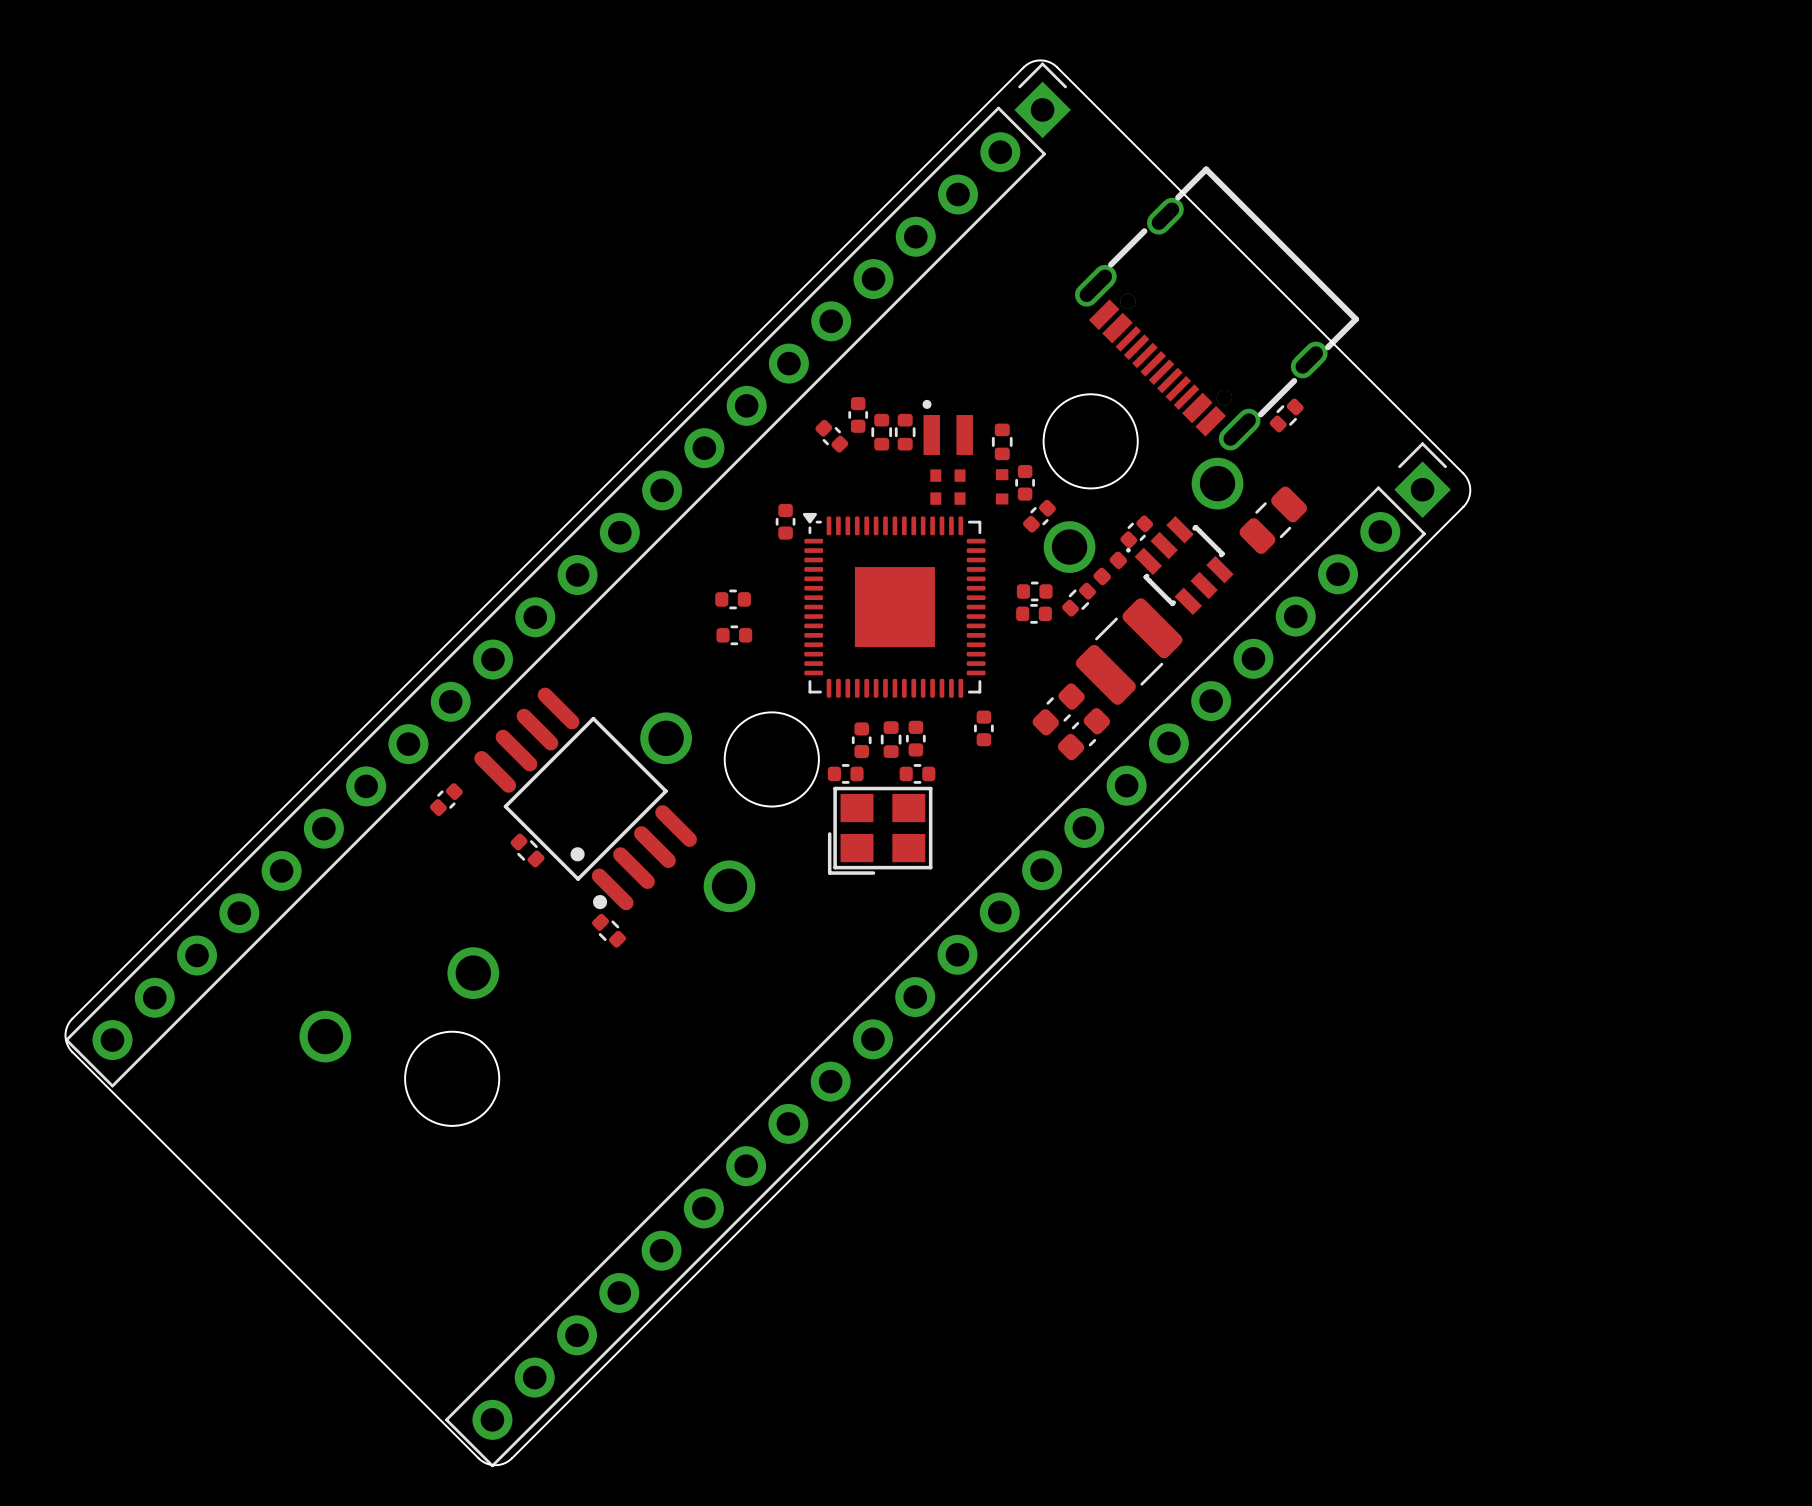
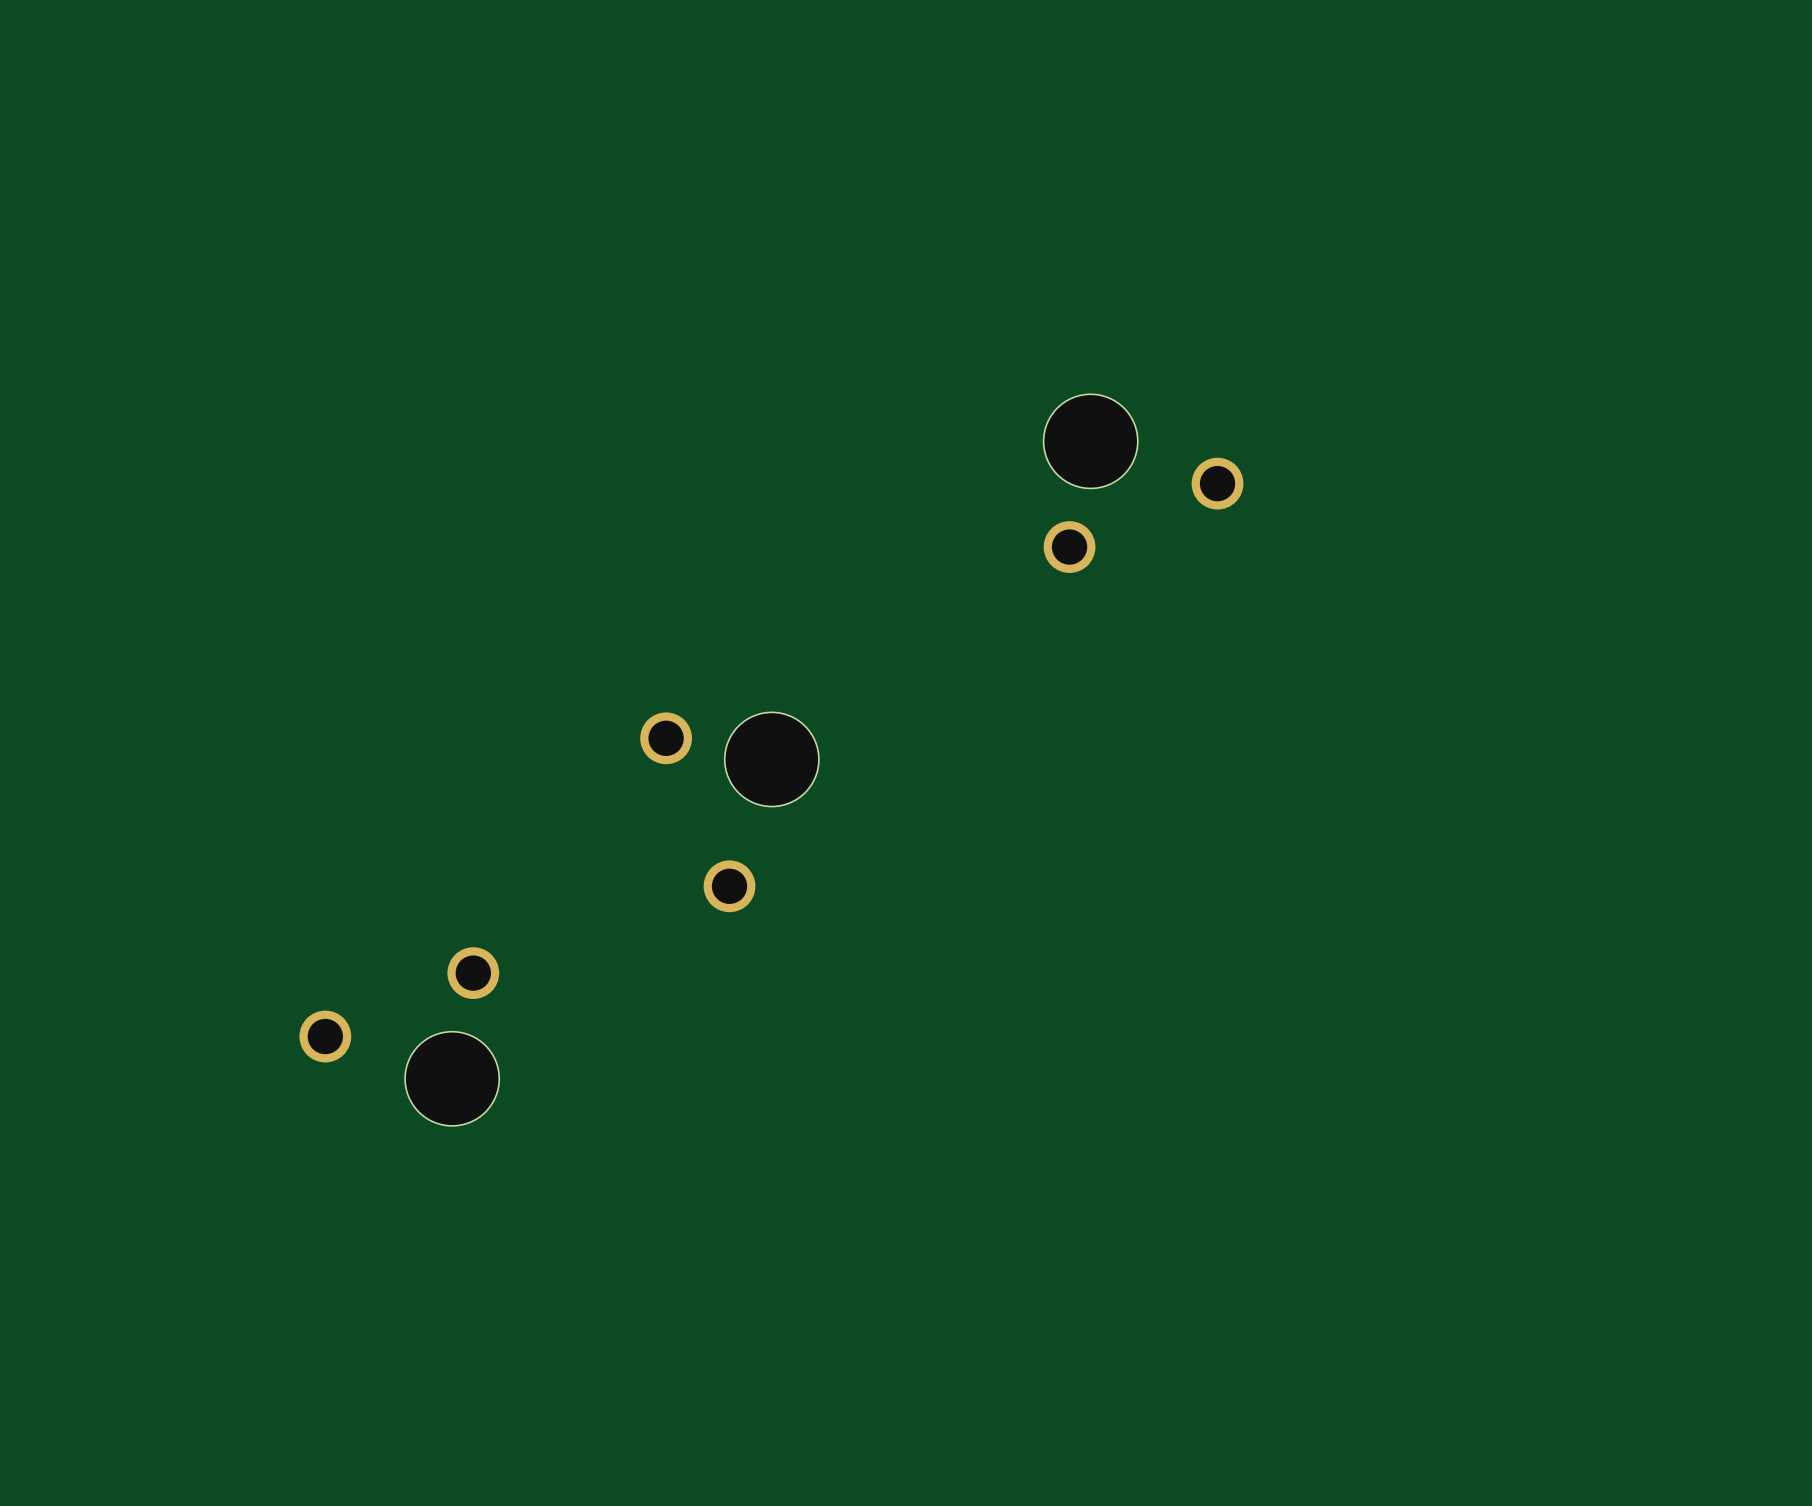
board edge: (1023, 67) (72, 1018) (66, 1027) (66, 1040) (72, 1052) (478, 1458) (487, 1463) (500, 1464) (511, 1458) (1463, 506) (1468, 499) (1469, 484) (1463, 473) (1057, 67) (1050, 62) (1040, 60) (1032, 61) (1023, 67) -> none
part: (1216, 308) -> none
part: (858, 414) -> none
part: (1286, 415) -> none
part: (947, 427) -> none
part: (881, 432) -> none
part: (905, 432) -> none
part: (831, 436) -> none
part: (1002, 441) -> none
part: (947, 475) -> none
part: (1025, 482) -> none
part: (1002, 486) -> none
part: (947, 498) -> none
part: (1039, 516) -> none
part: (1273, 520) -> none
part: (785, 521) -> none
part: (1136, 531) -> none
part: (1184, 565) -> none
part: (1112, 566) -> none
part: (568, 574) -> none
part: (1034, 591) -> none
part: (733, 599) -> none
part: (1078, 599) -> none
part: (894, 605) -> none
part: (1034, 613) -> none
part: (734, 635) -> none
part: (1129, 651) -> none
part: (1058, 709) -> none
part: (983, 728) -> none
part: (1083, 734) -> none
part: (915, 738) -> none
part: (891, 739) -> none
part: (861, 740) -> none
part: (845, 773) -> none
part: (917, 773) -> none
part: (585, 798) -> none
part: (446, 799) -> none
part: (880, 830) -> none
part: (527, 850) -> none
part: (609, 930) -> none
part: (947, 954) -> none

